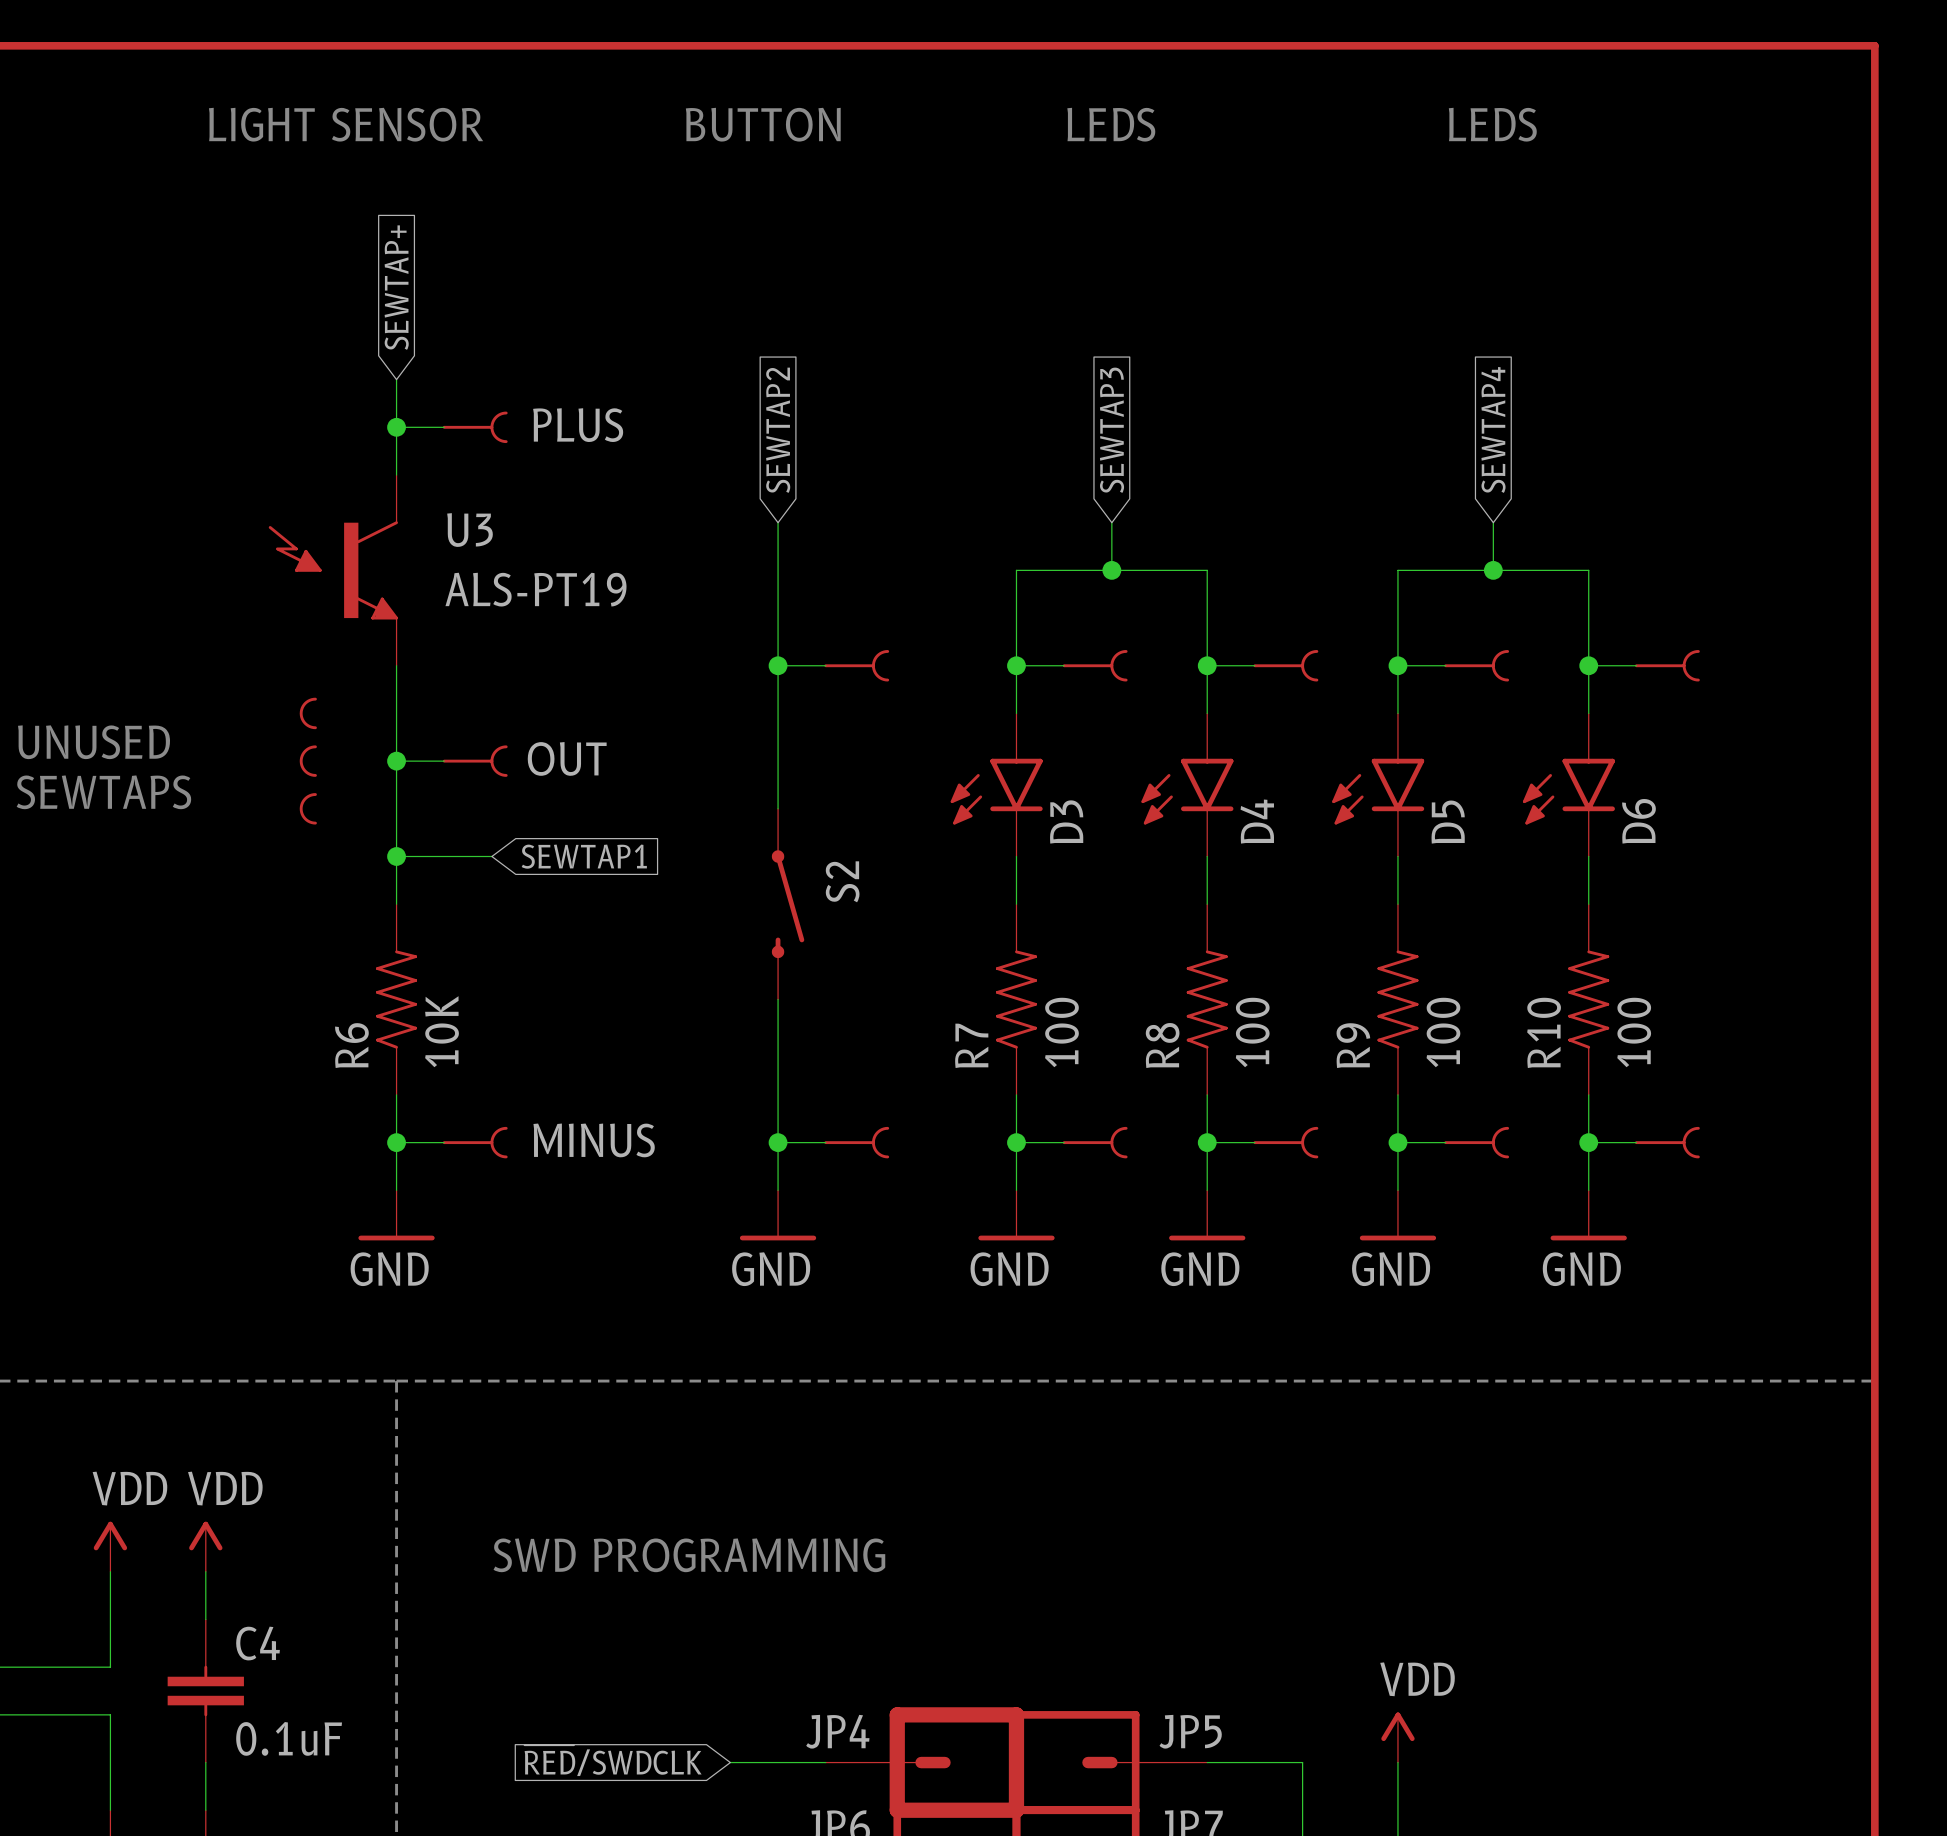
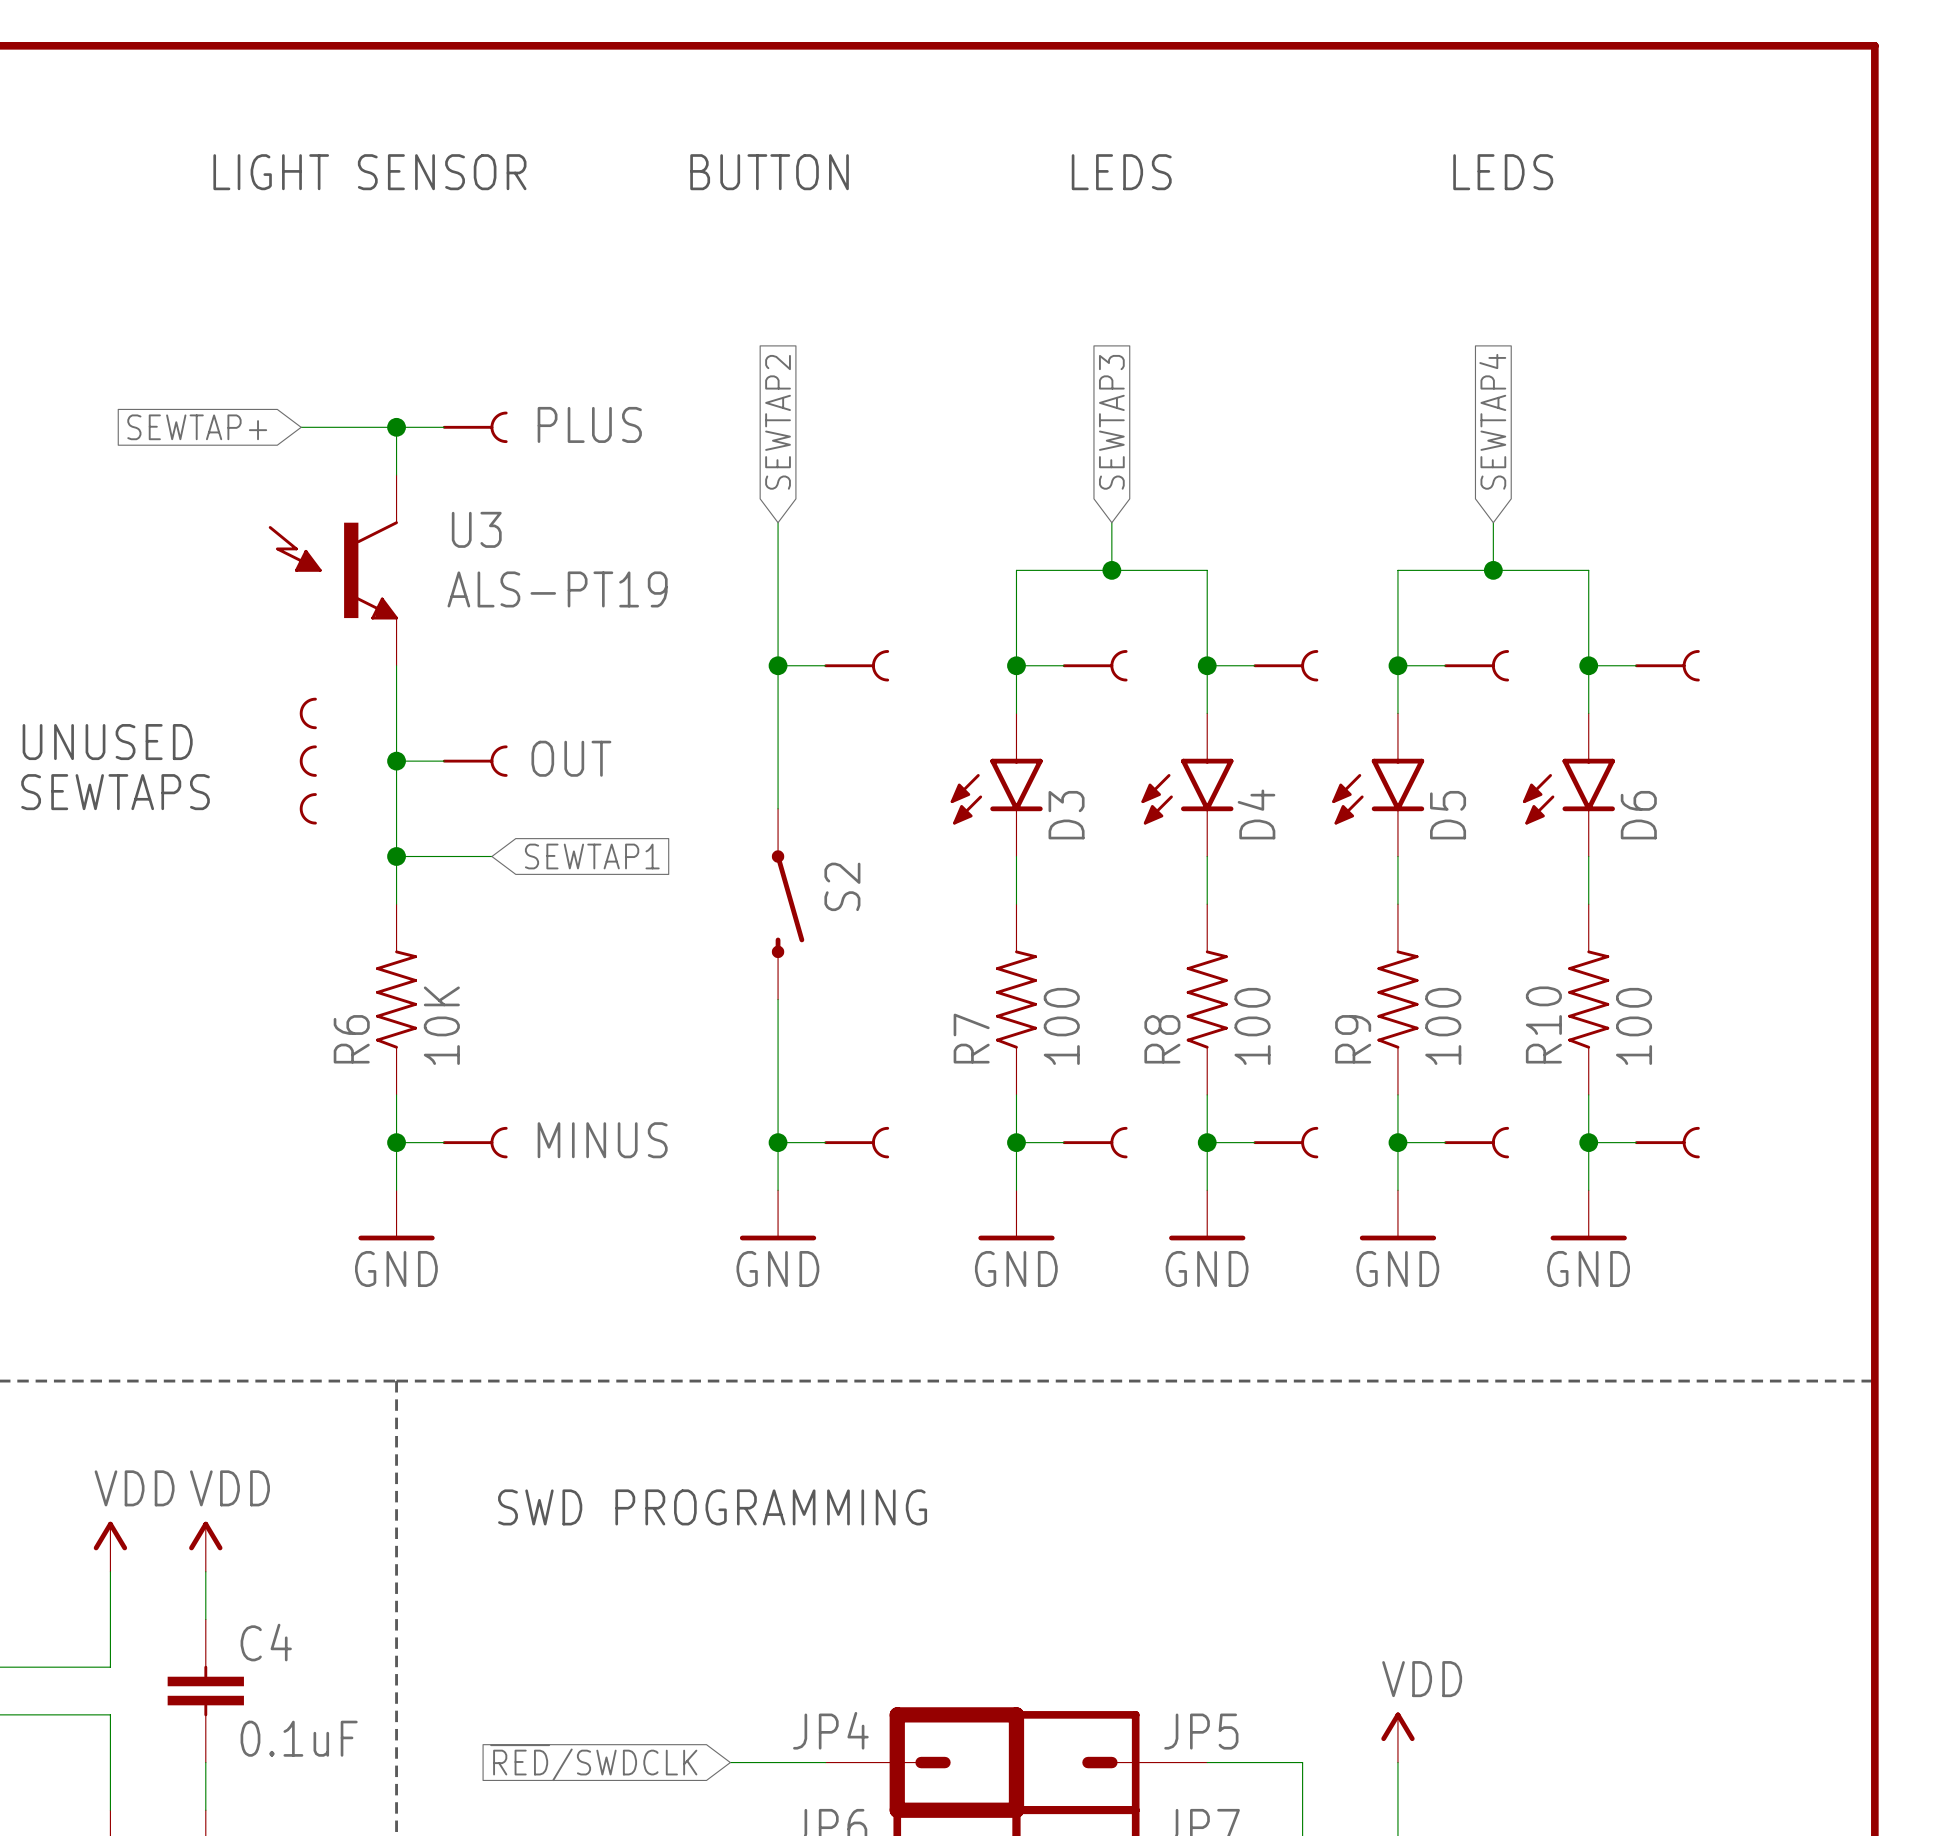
text position: LIGHT SENSOR (346, 124) -> LIGHT SENSOR (369, 172)
text position: BUTTON (763, 124) -> BUTTON (769, 172)
text position: LEDS (1111, 124) -> LEDS (1121, 172)
text position: LEDS (1492, 124) -> LEDS (1503, 172)
global label rotation: 0° (396, 287) -> 90° counterclockwise (197, 427)
global label position: SEWTAP+ (396, 287) -> SEWTAP+ (197, 427)
wire: (396, 379) (396, 427) -> (301, 427) (396, 427)
text position: SWD PROGRAMMING (689, 1555) -> SWD PROGRAMMING (712, 1507)

